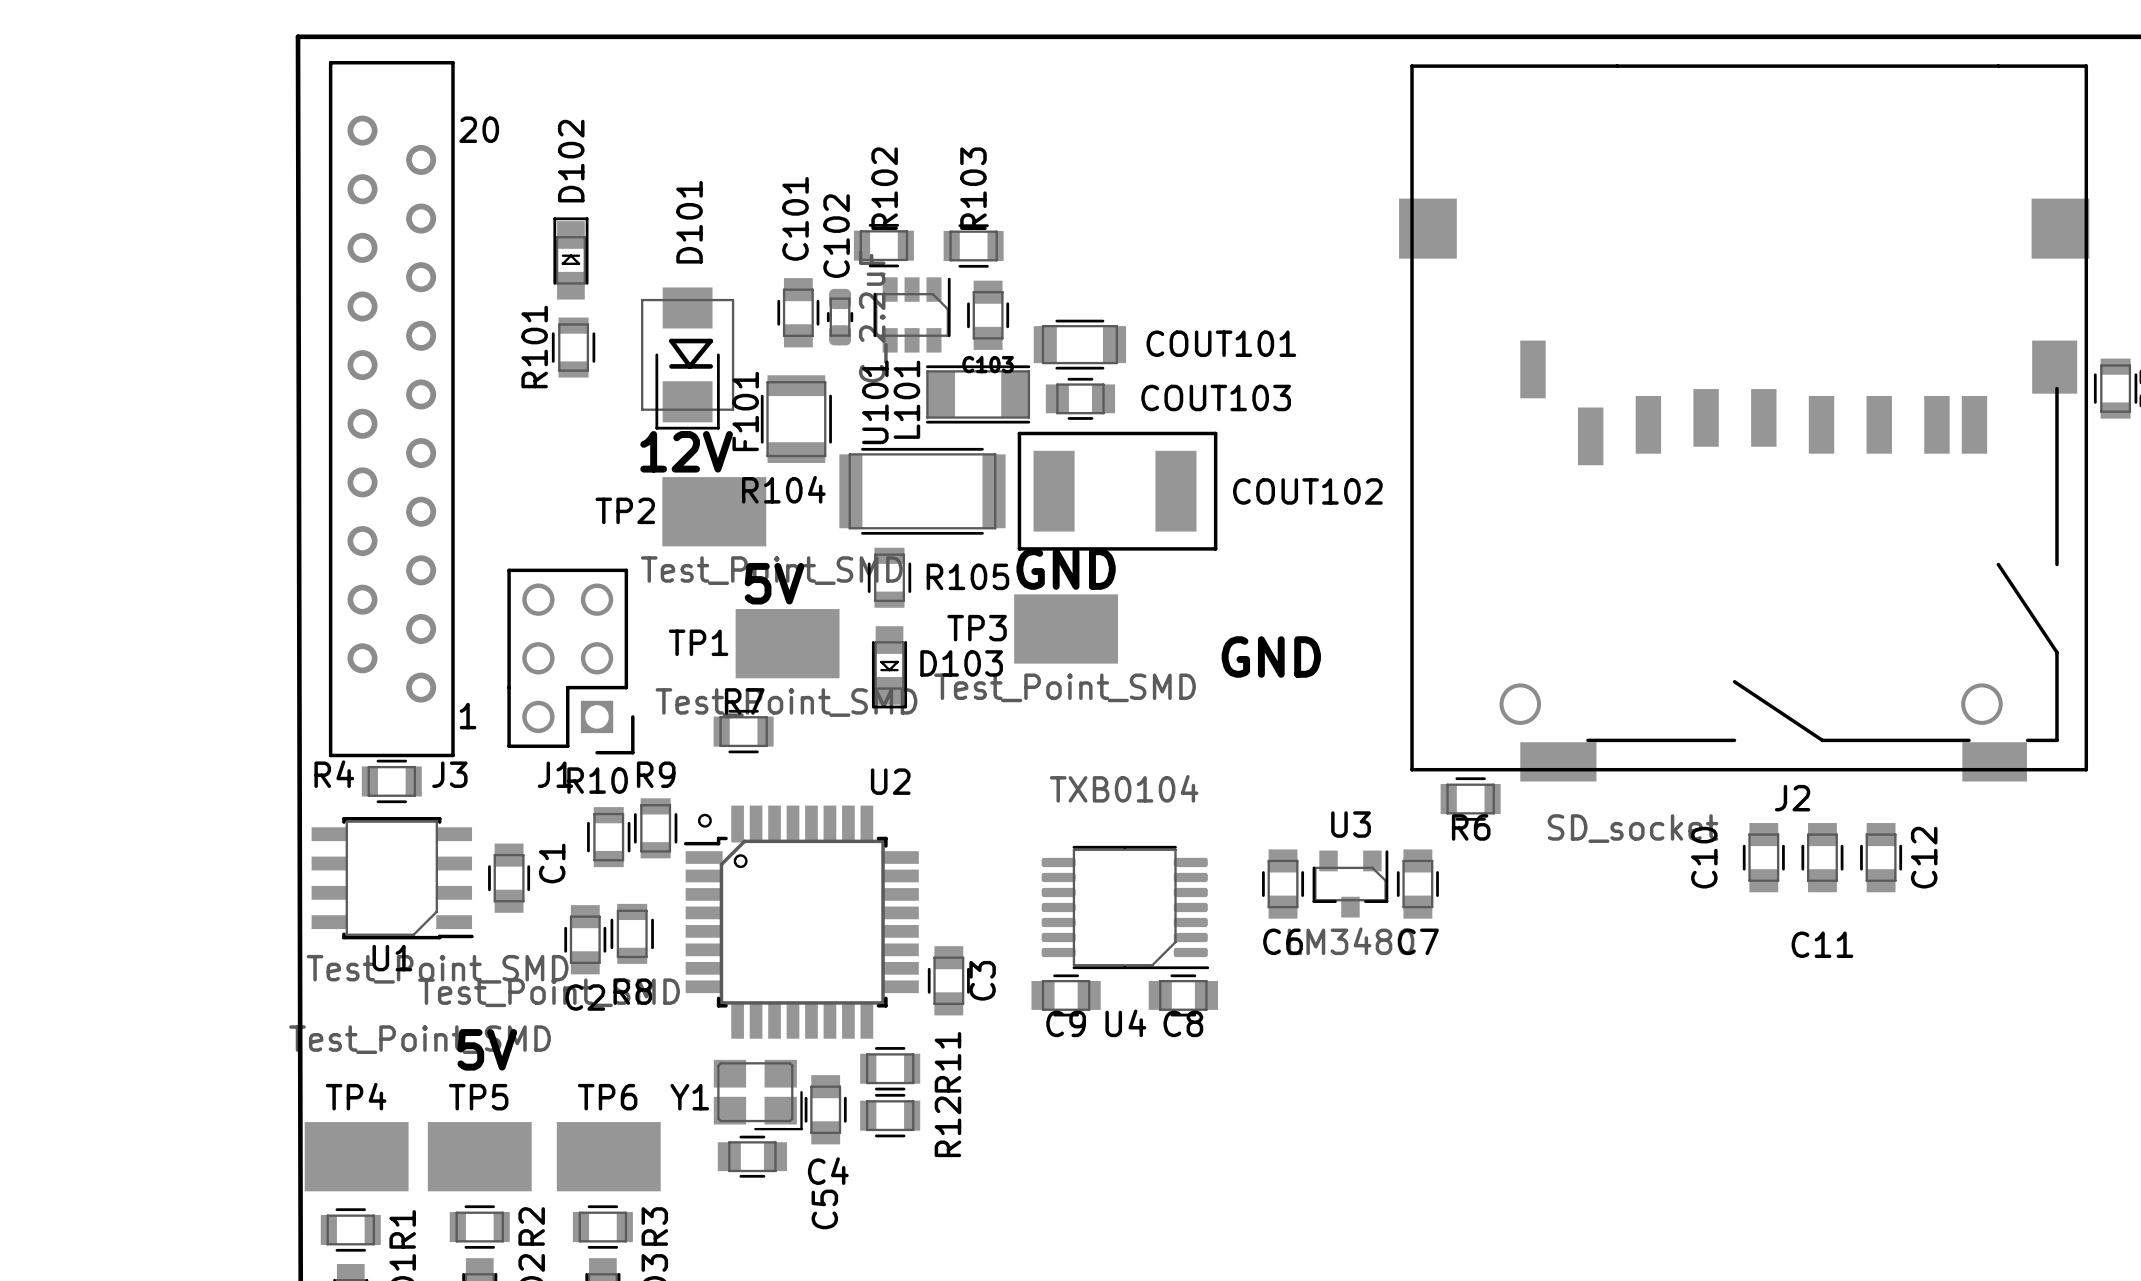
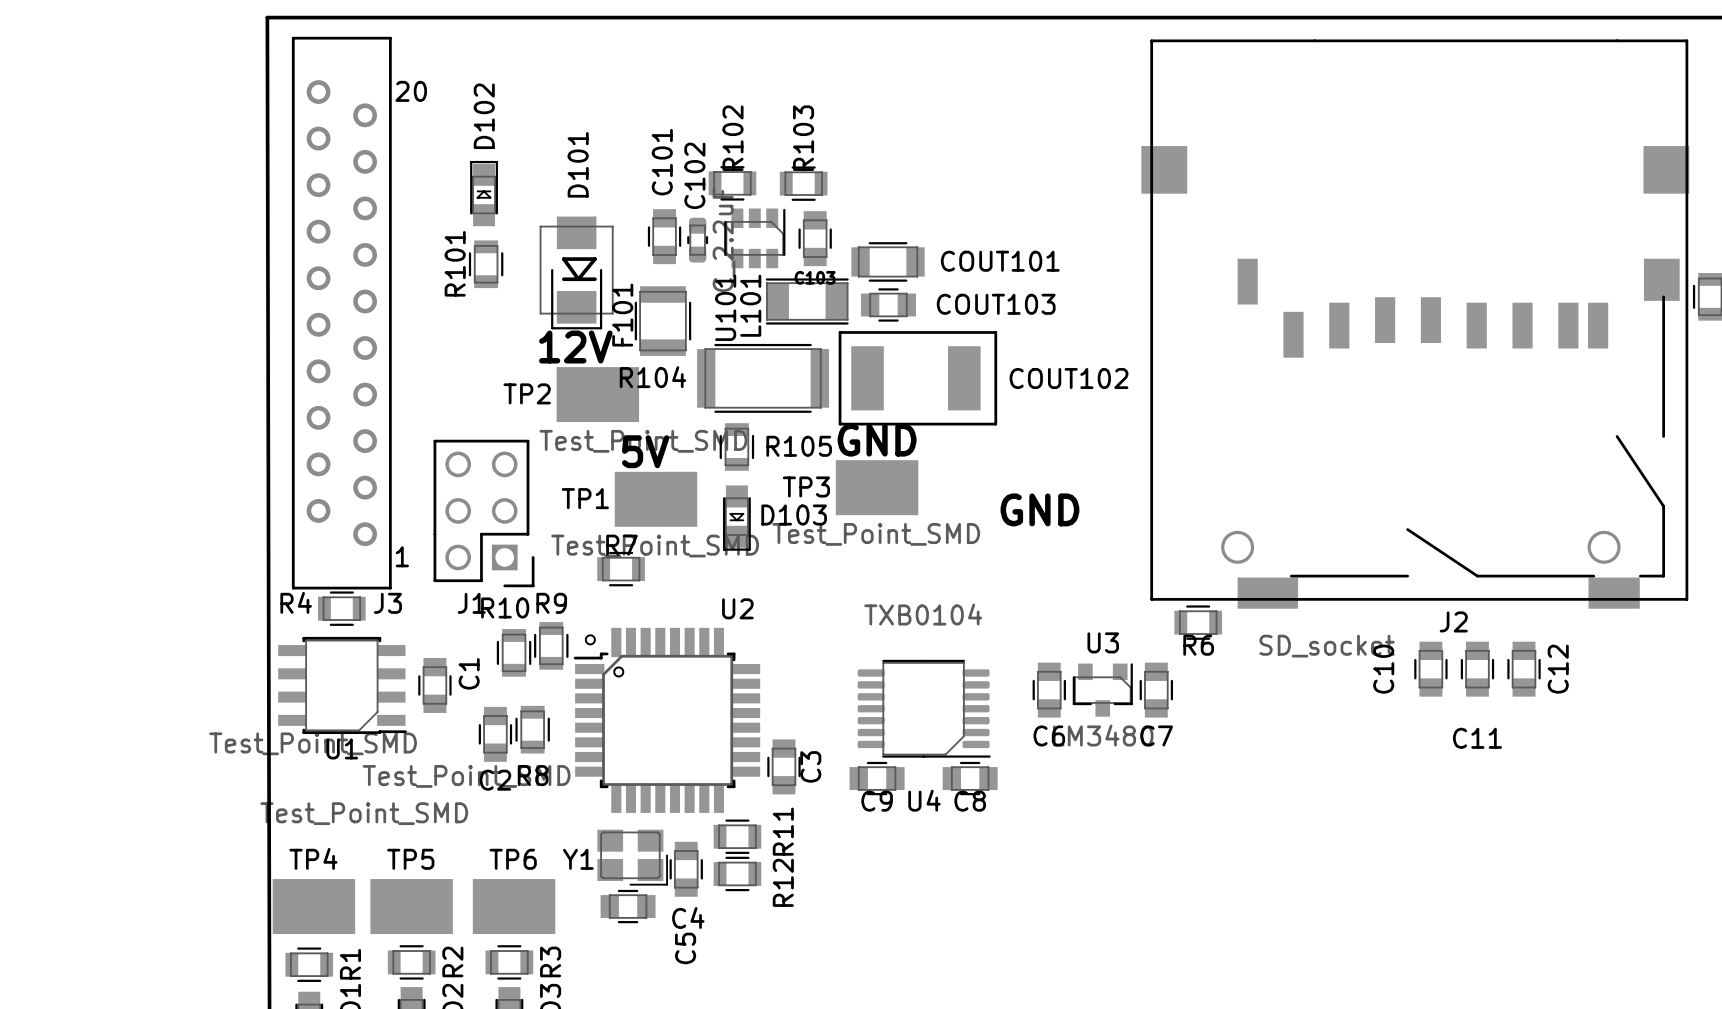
TP4 value position: Test_Point_SMD (437, 969) -> Test_Point_SMD (313, 743)
text: 5V (487, 1049) -> none

